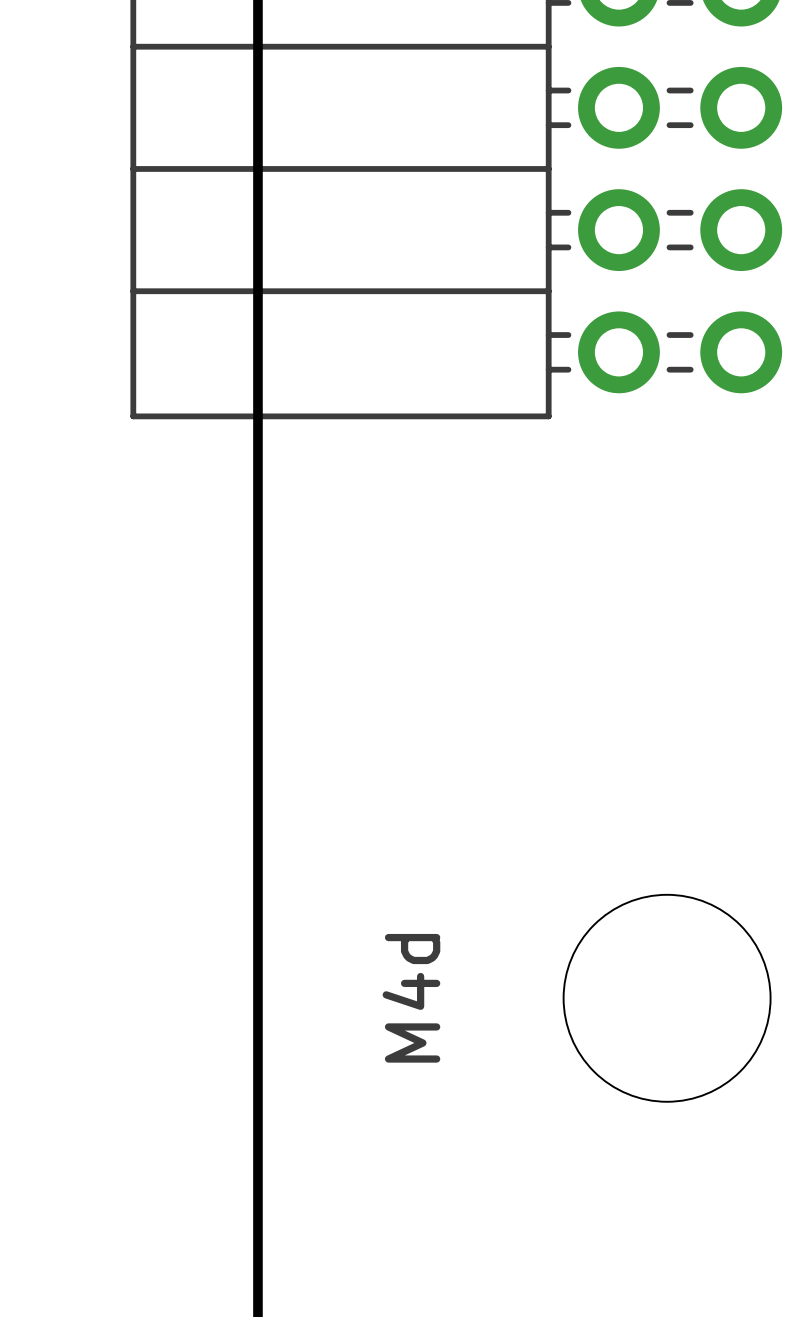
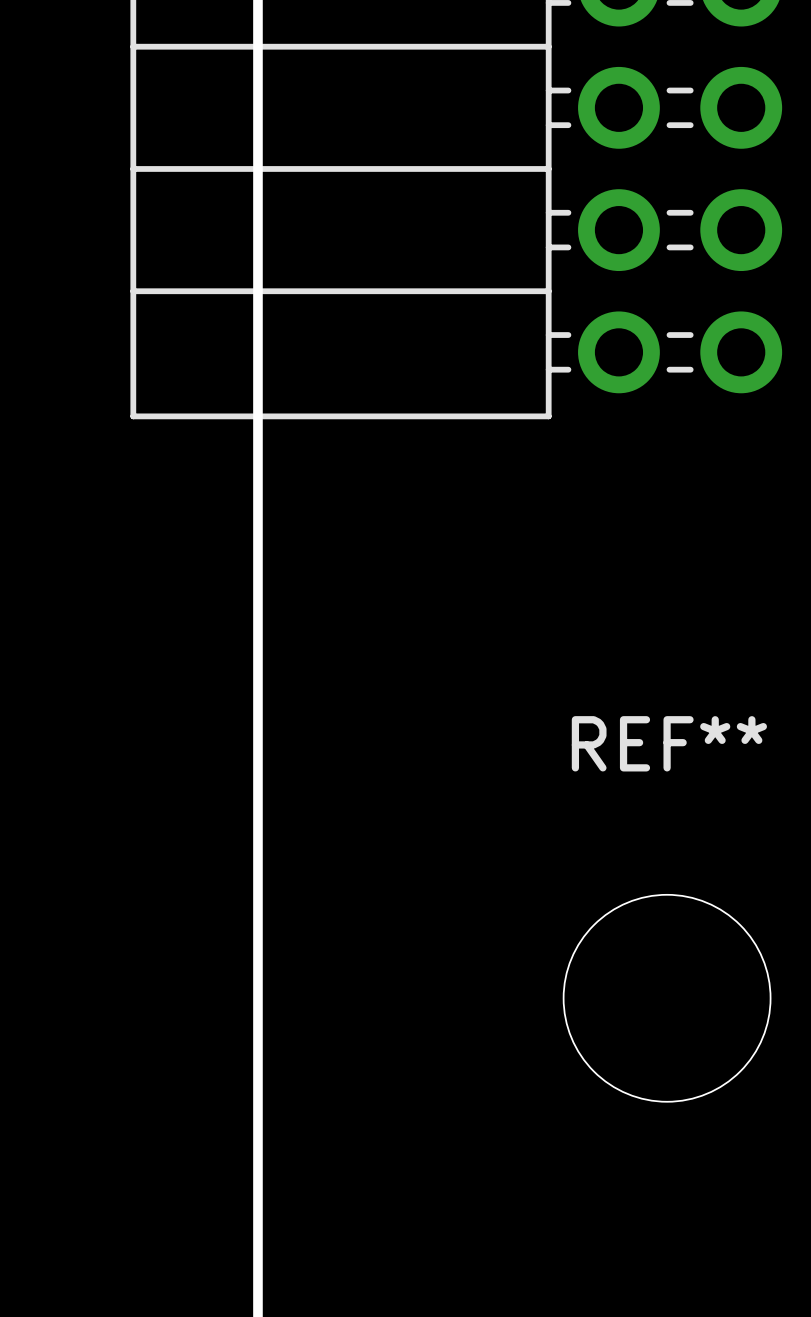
M4d name: M4d (411, 998) -> REF** (669, 743)

